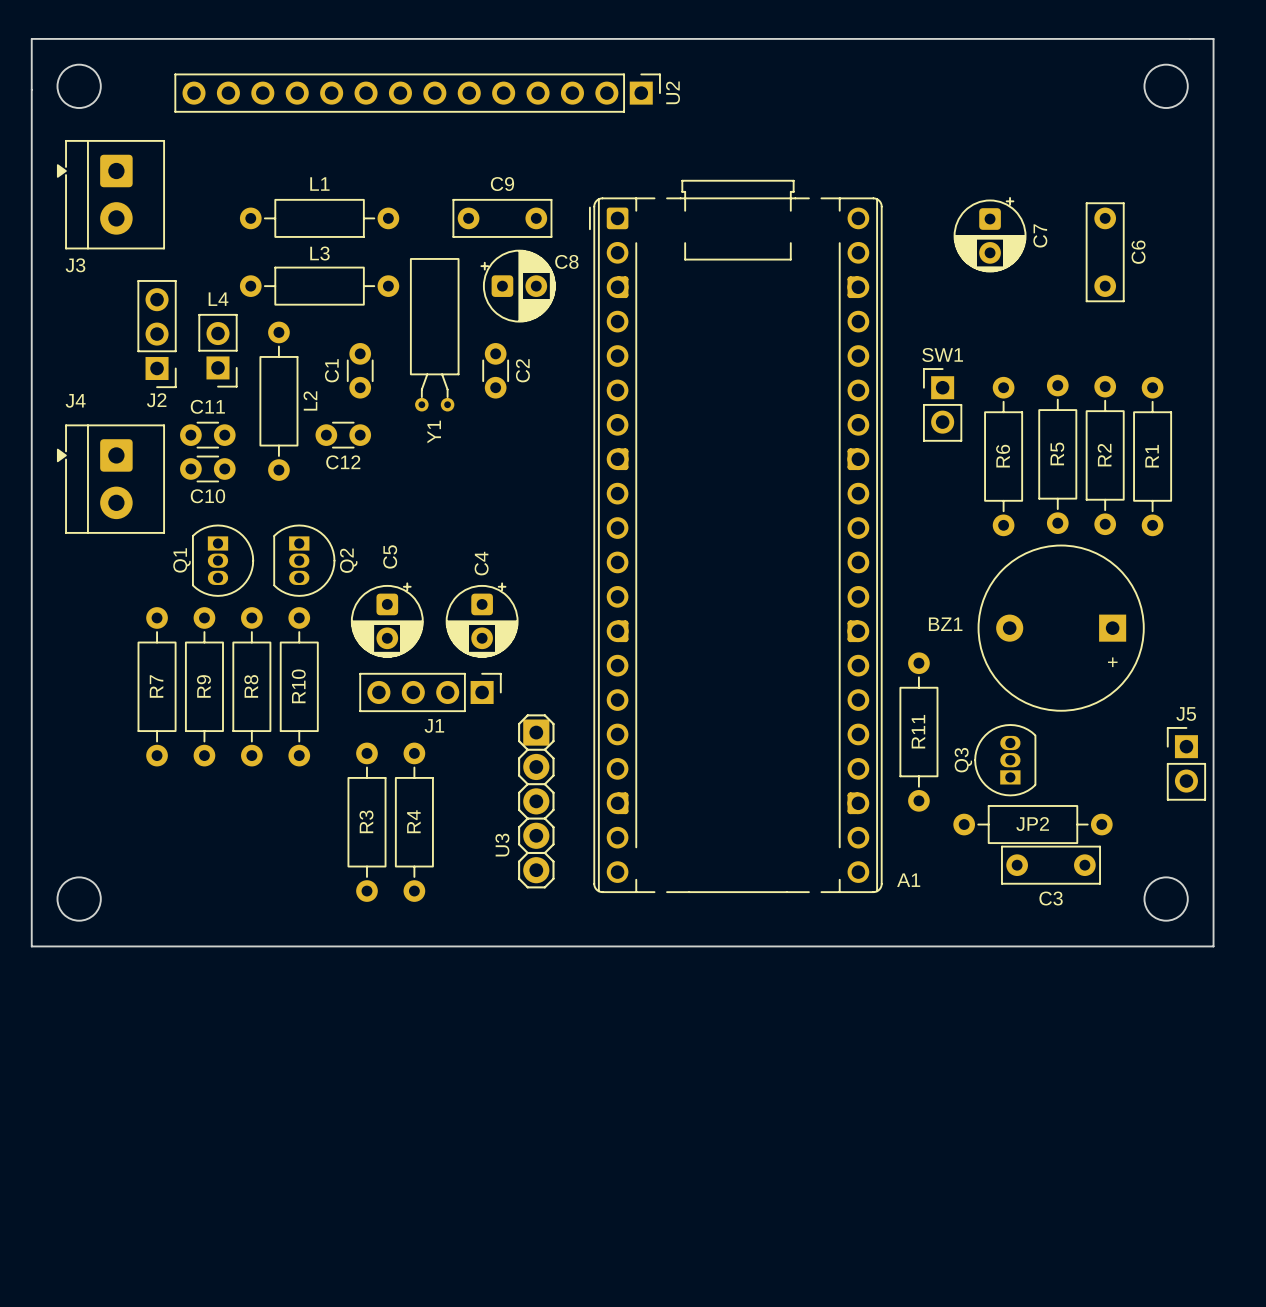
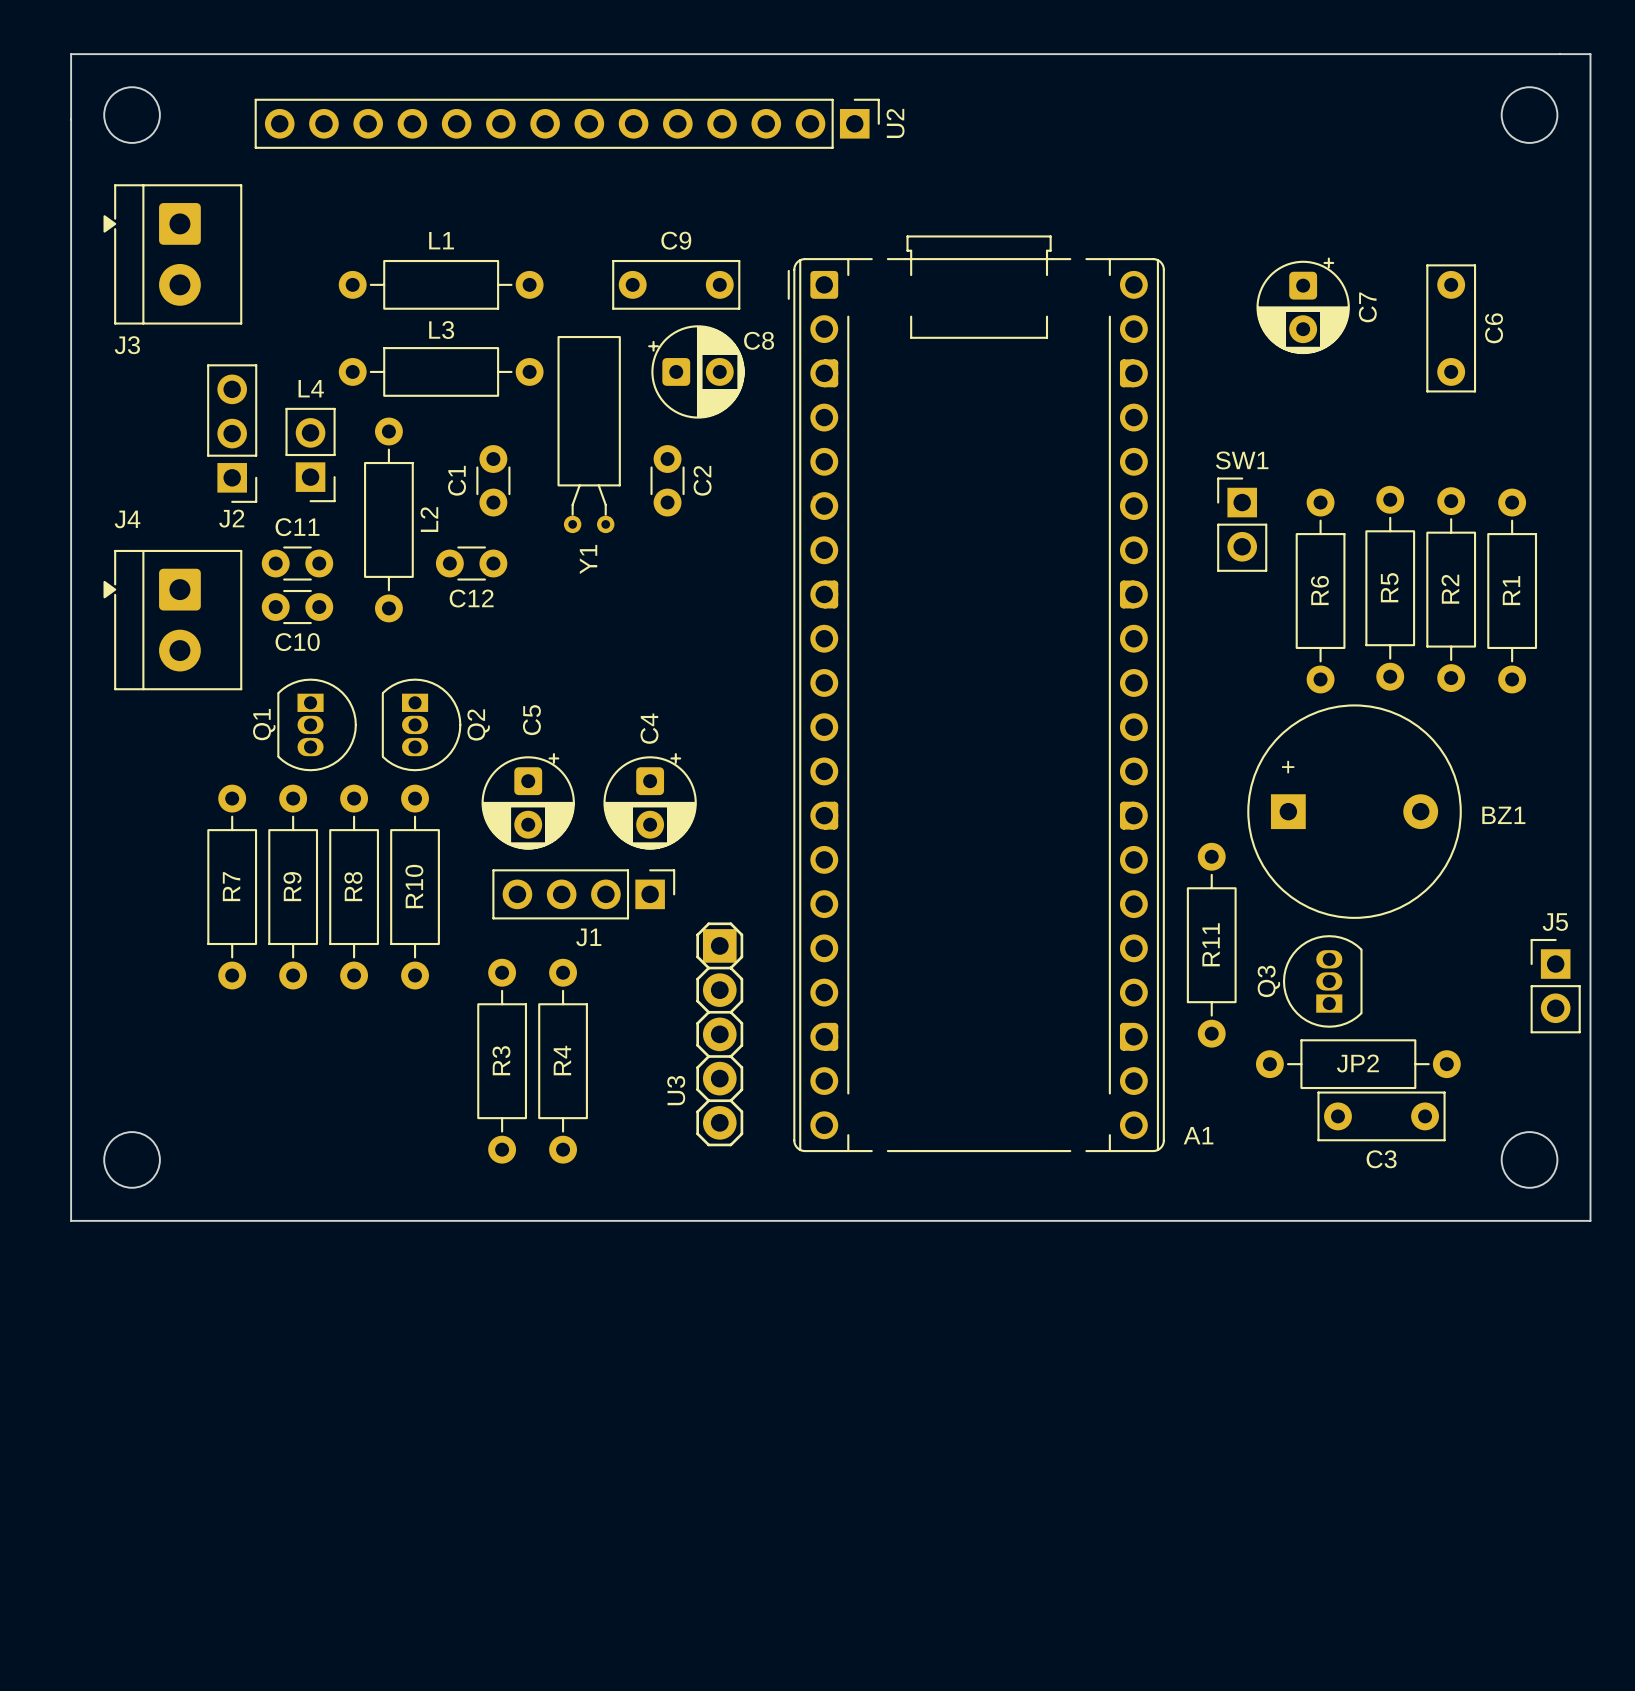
BZ1 rotation: 0° (1061, 628) -> 180° (1354, 811)

